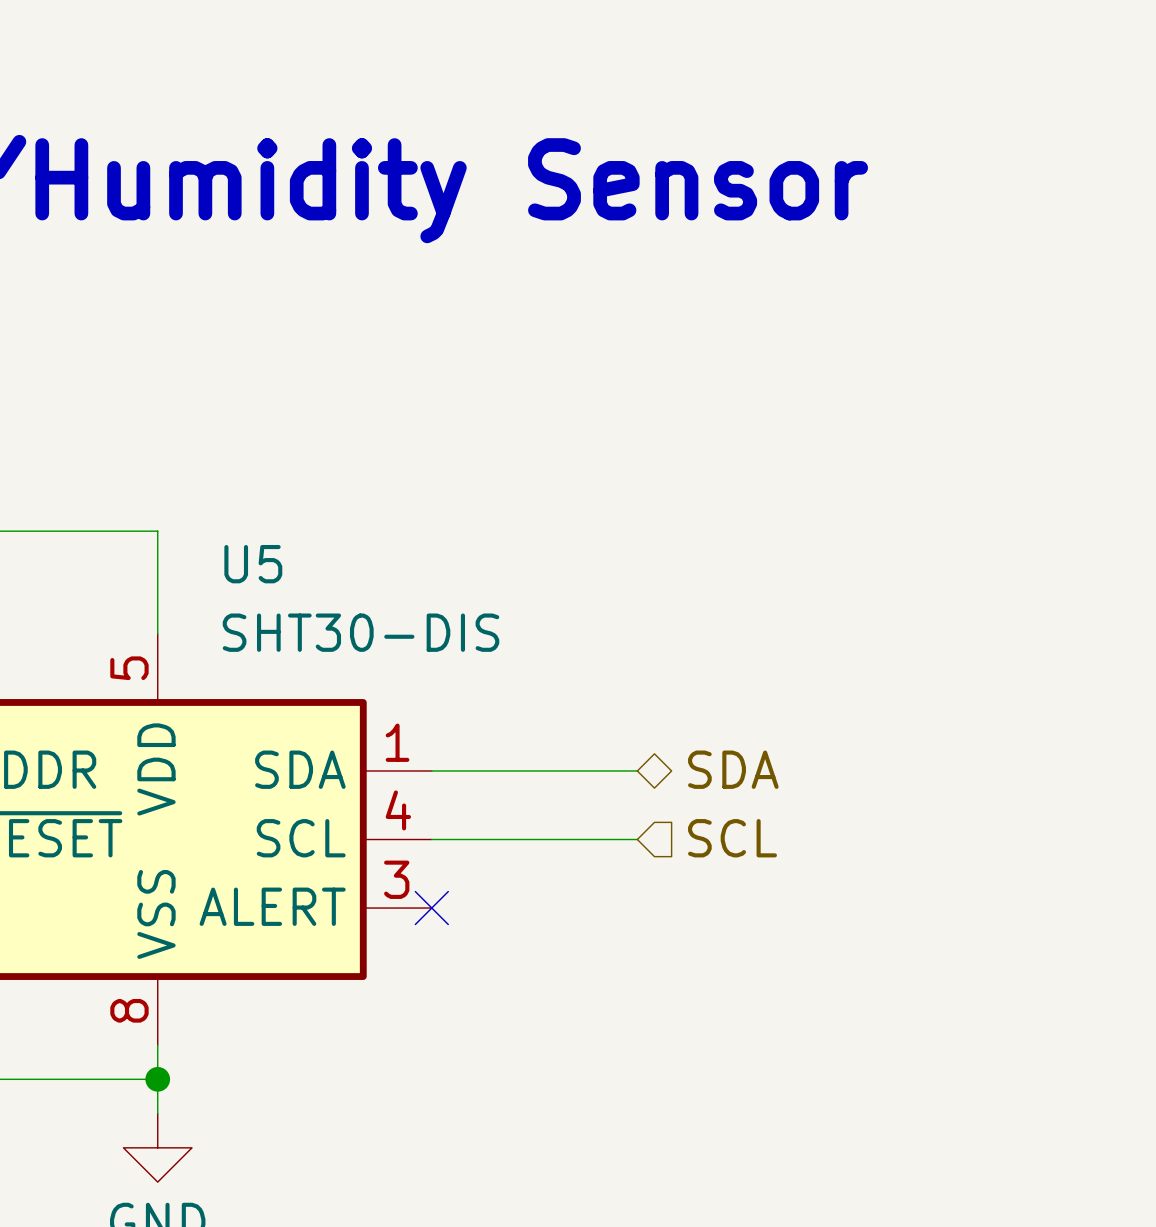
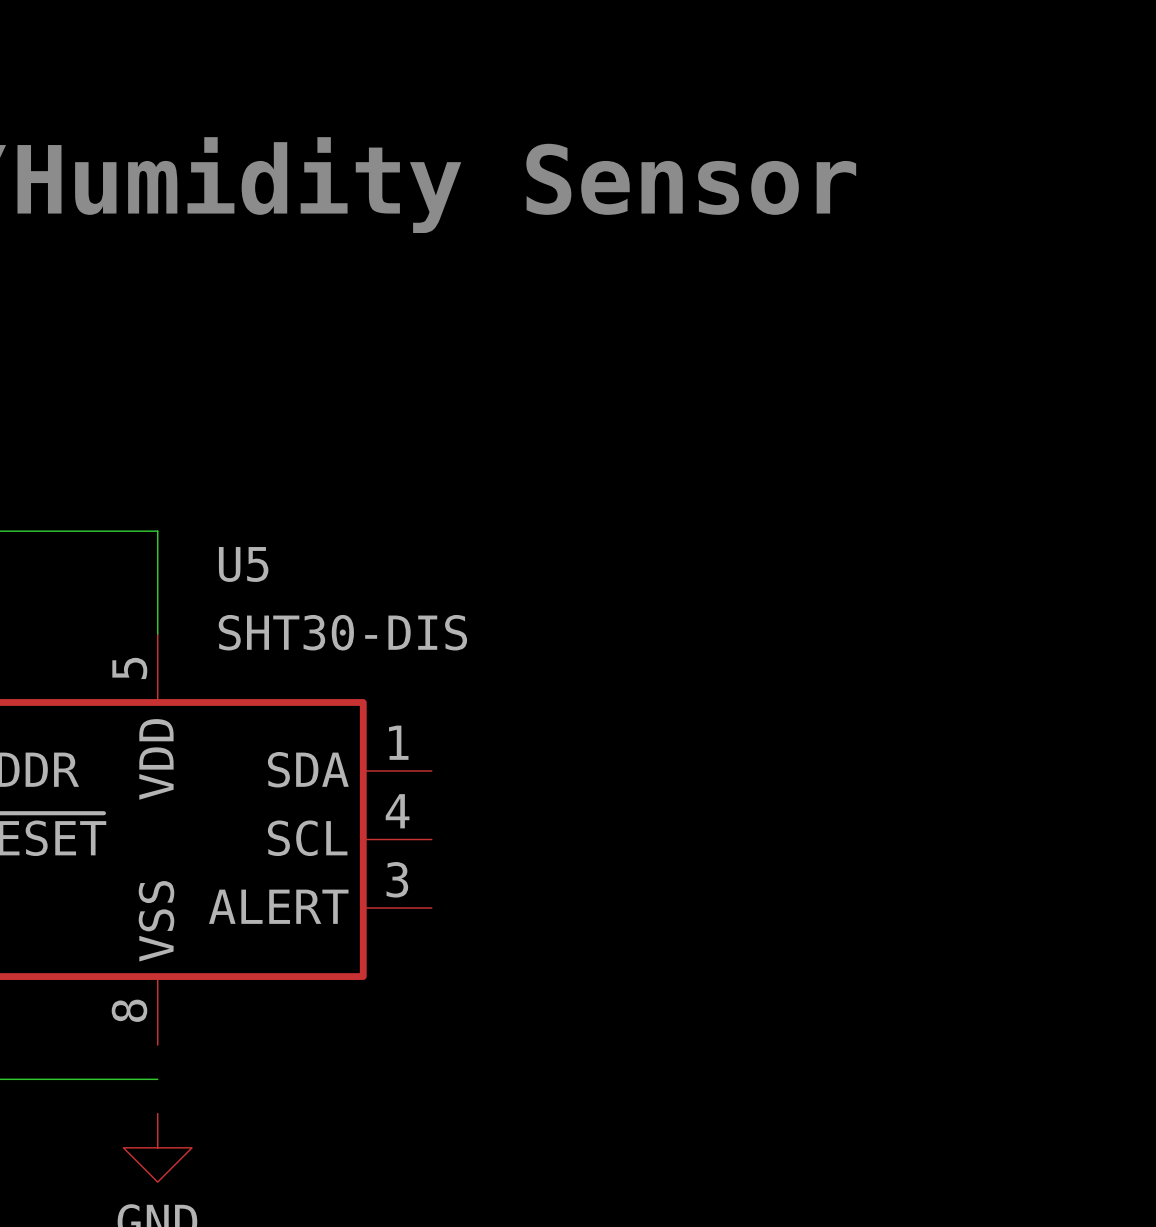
hierarchical label: SDA (733, 769) -> none
wire: (431, 770) (637, 770) -> none
hierarchical label: SCL (732, 838) -> none
wire: (431, 839) (637, 839) -> none
no-connect mark: (431, 908) -> none
wire: (157, 1045) (157, 1113) -> none
junction: (157, 1079) -> none

